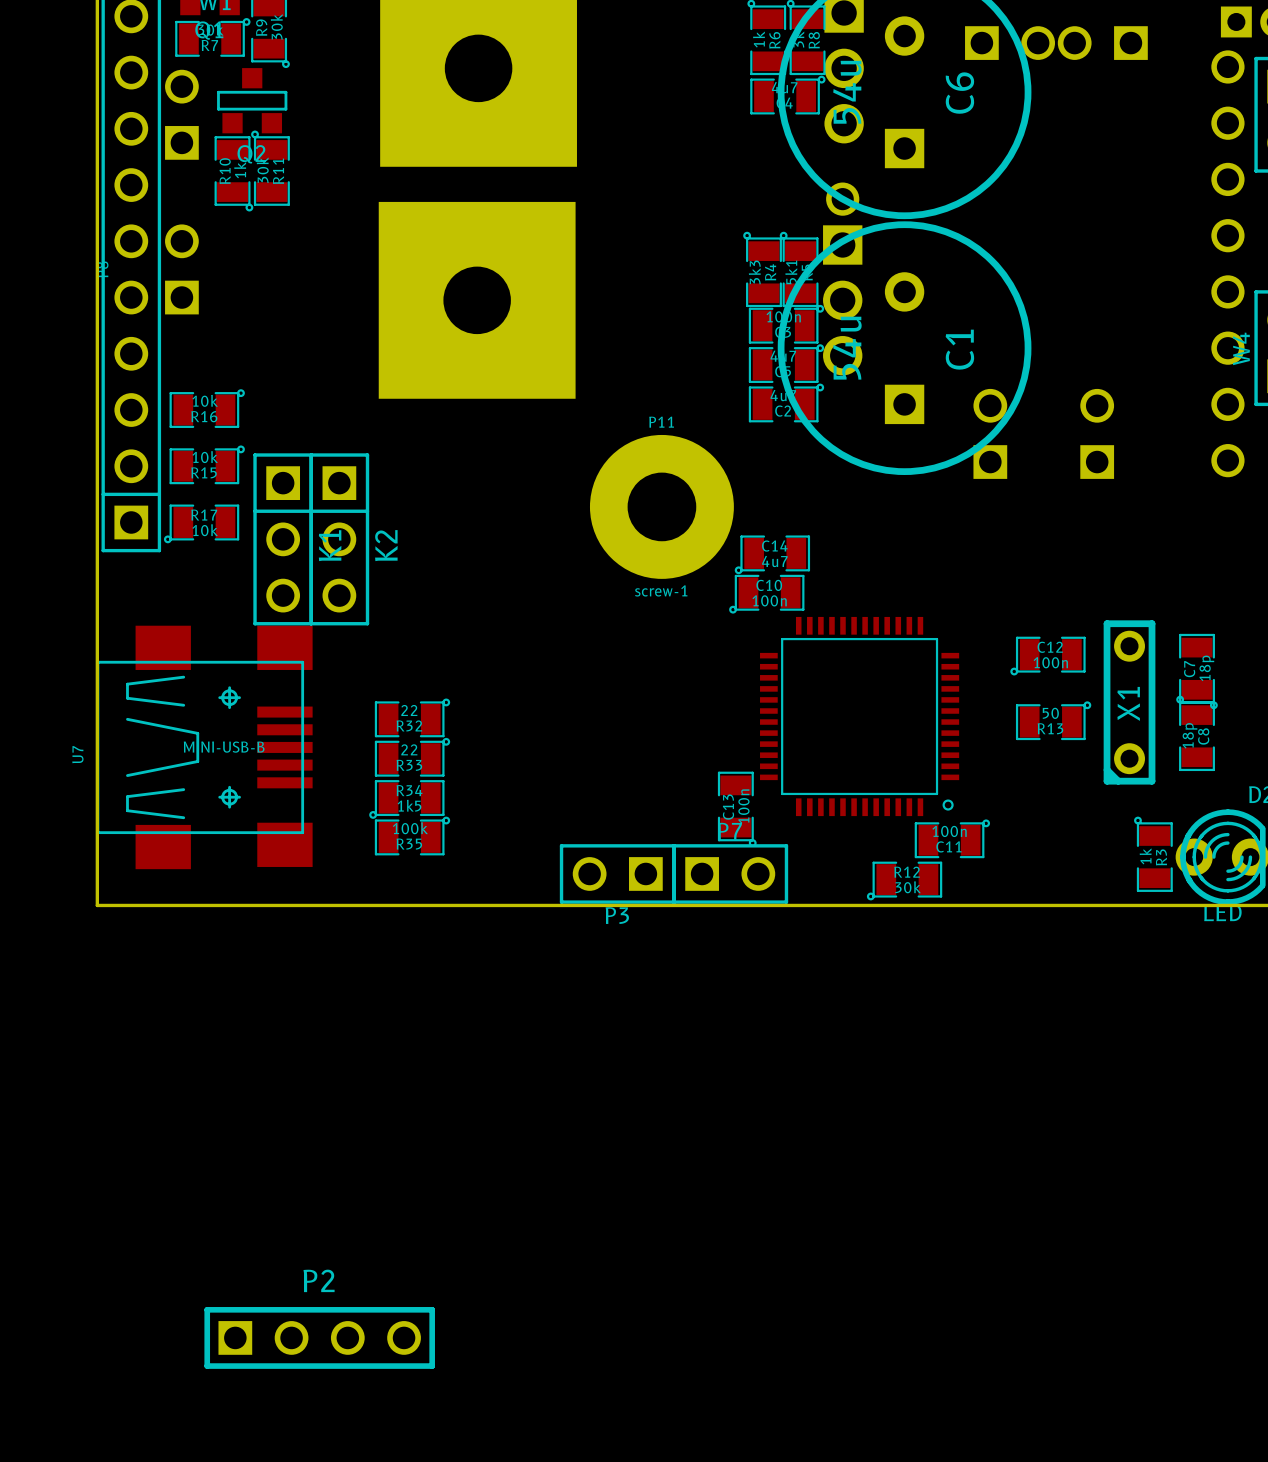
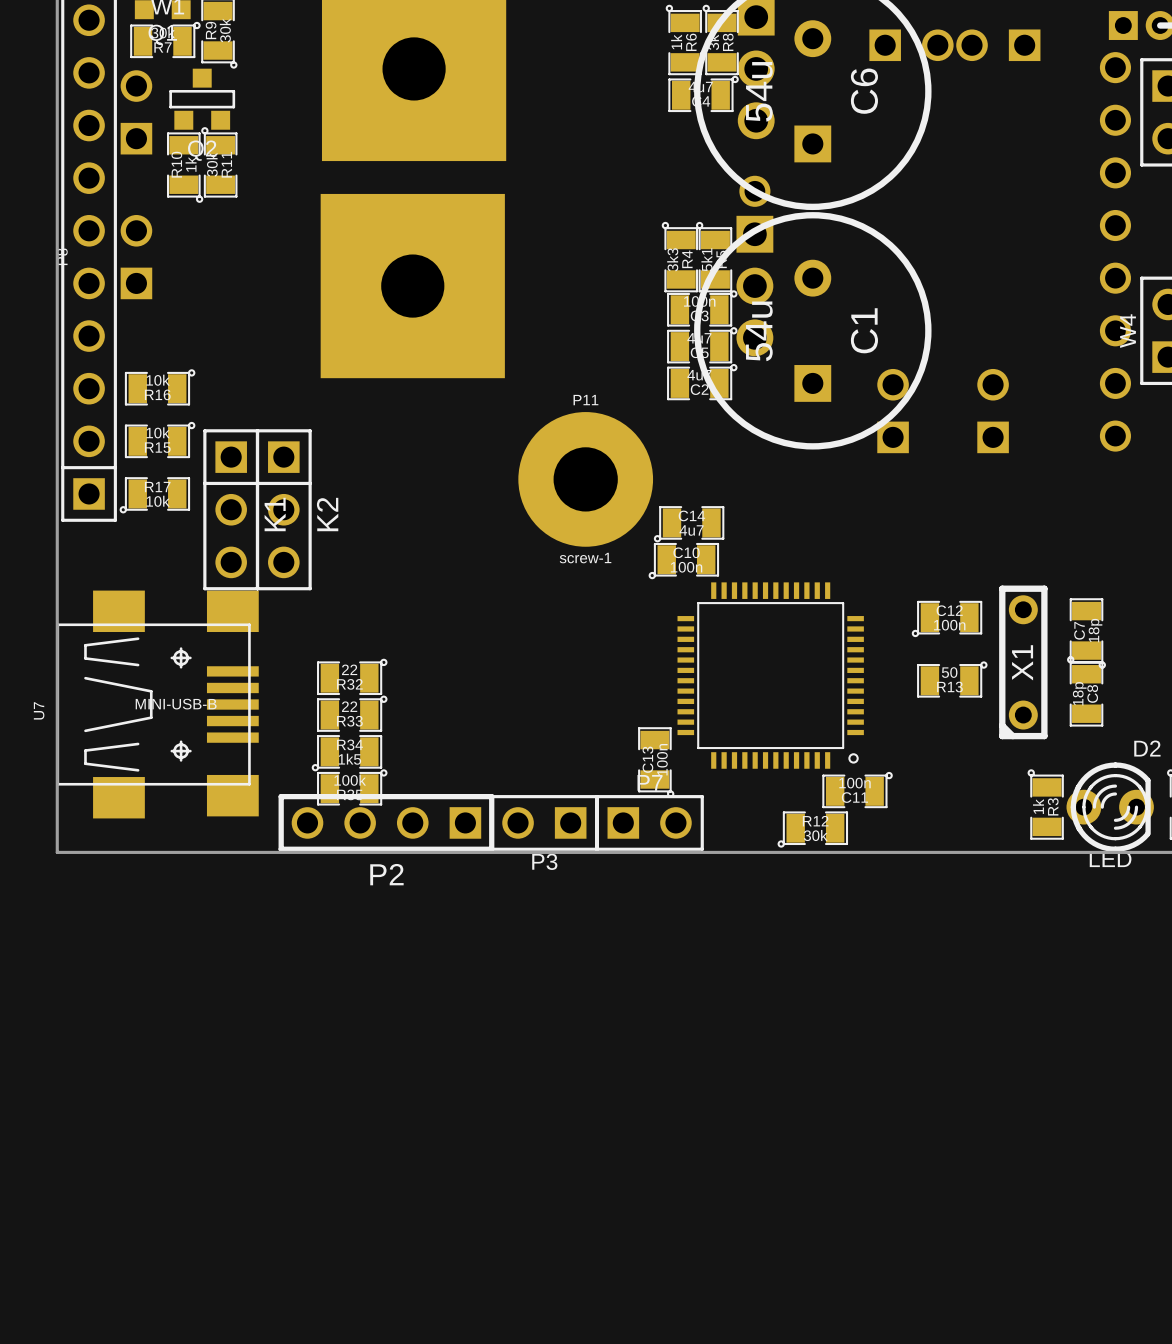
P2 rotation: 0° (319, 1337) -> 180° (386, 822)
P2 position: (319, 1337) -> (386, 822)

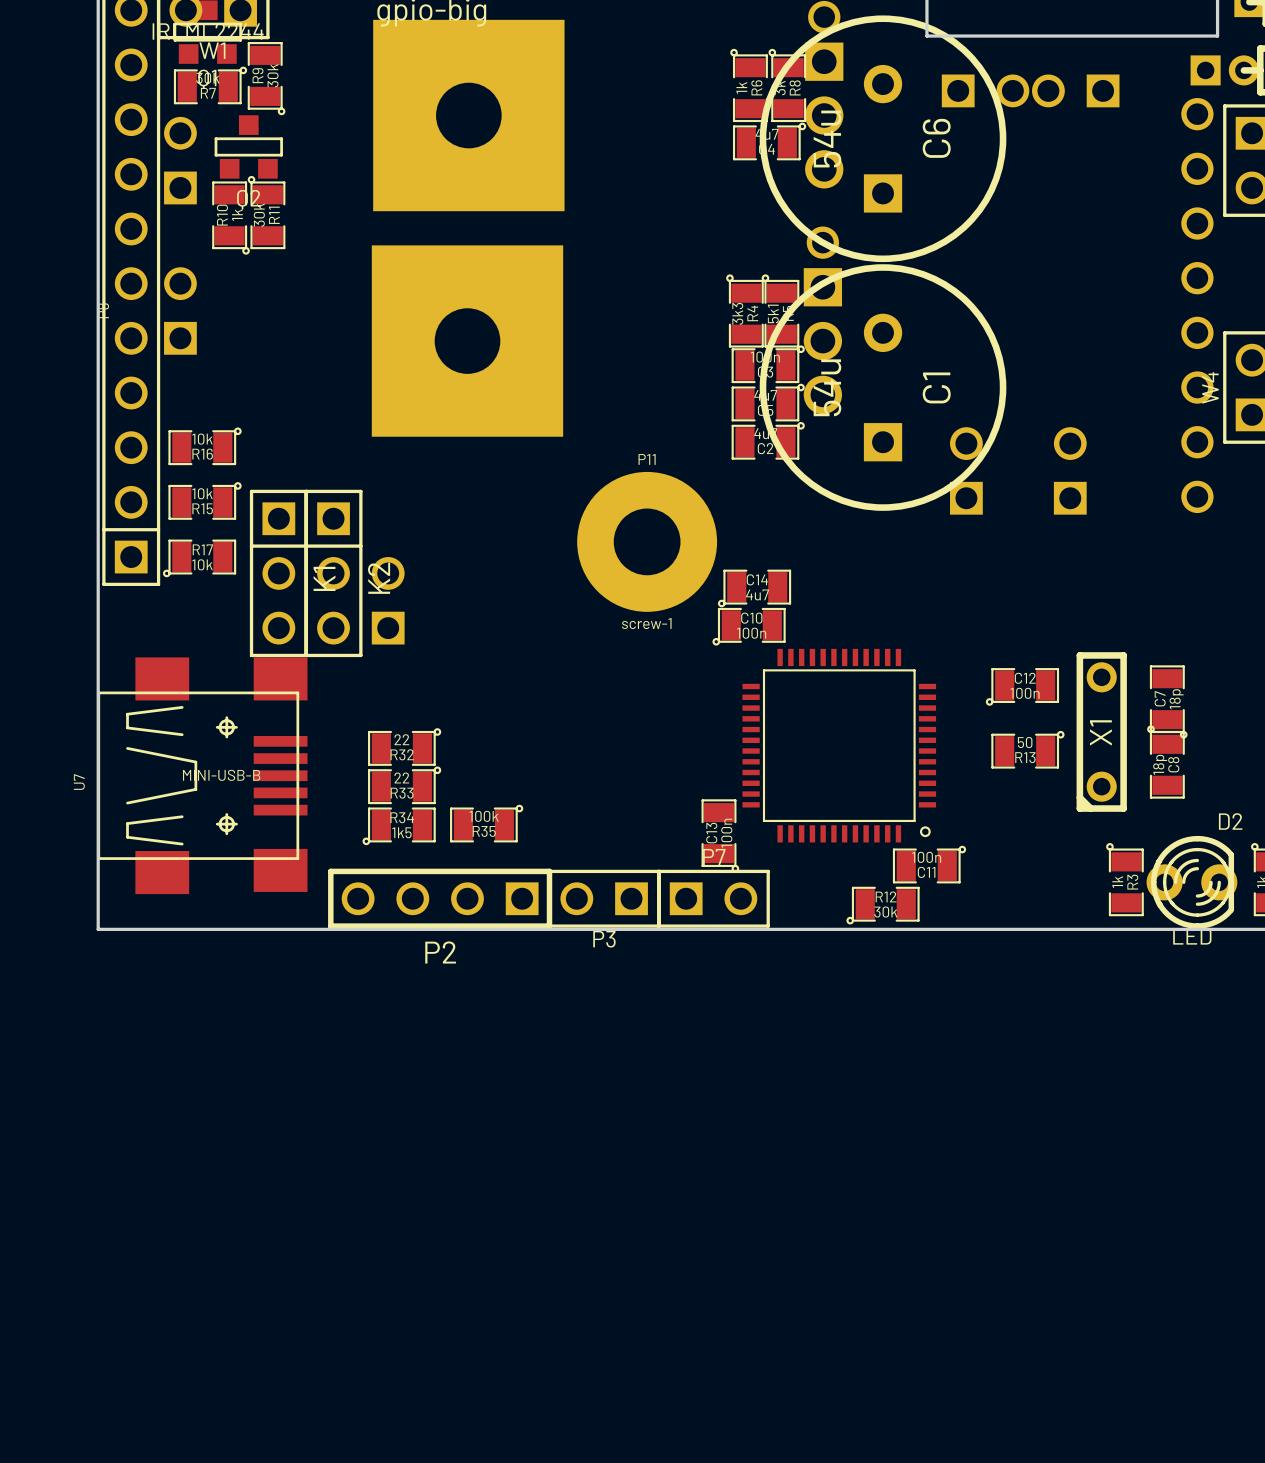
part: none -> (388, 600)
R35 position: (352, 787) -> (486, 823)

